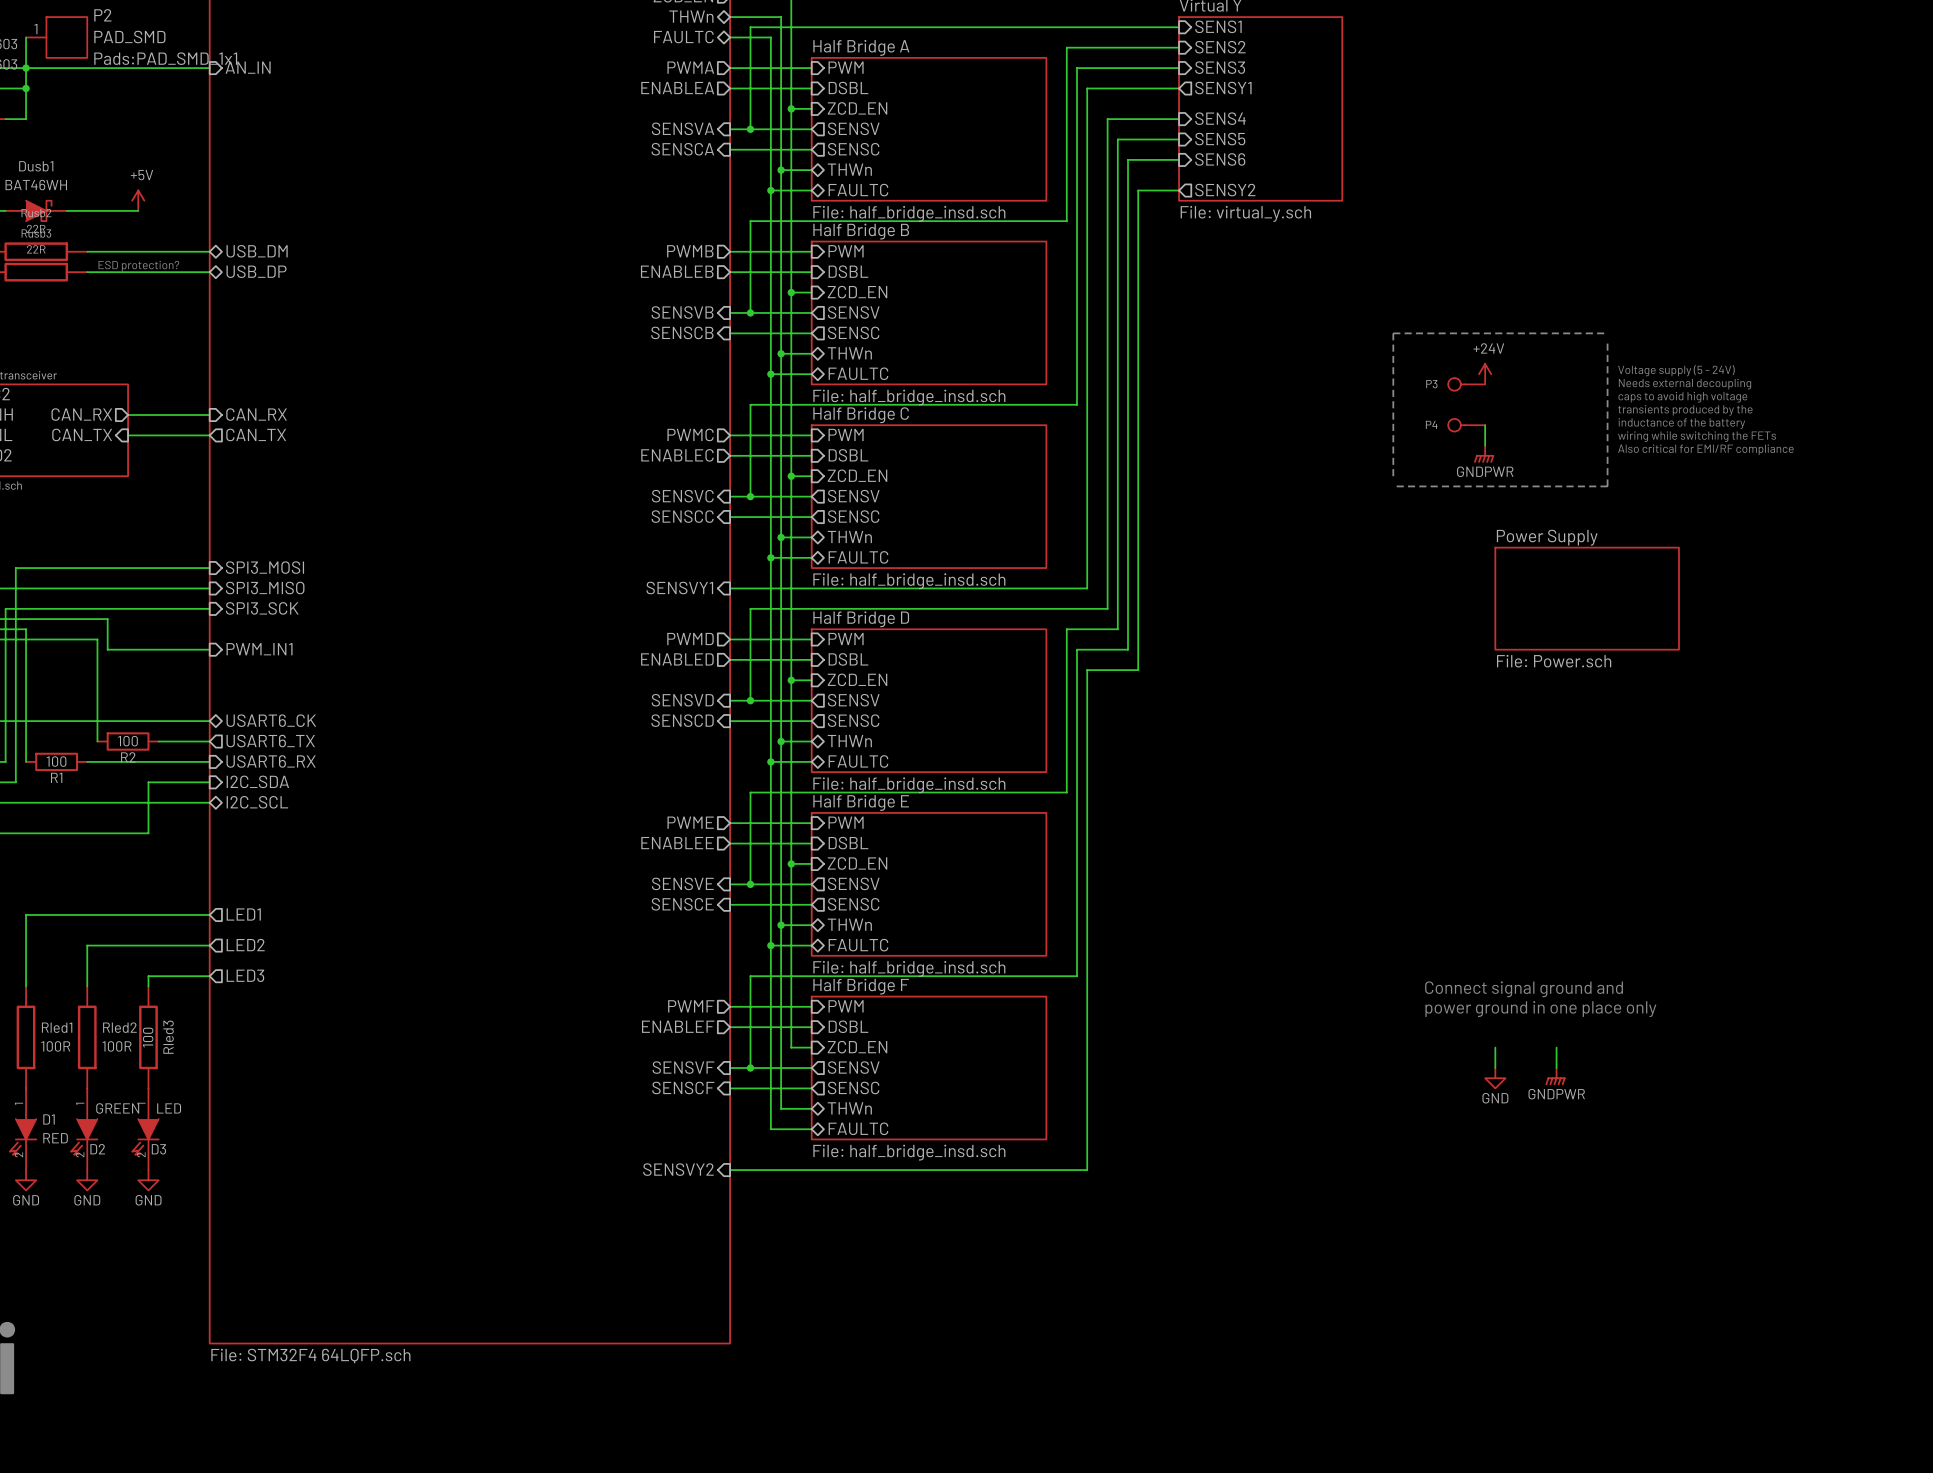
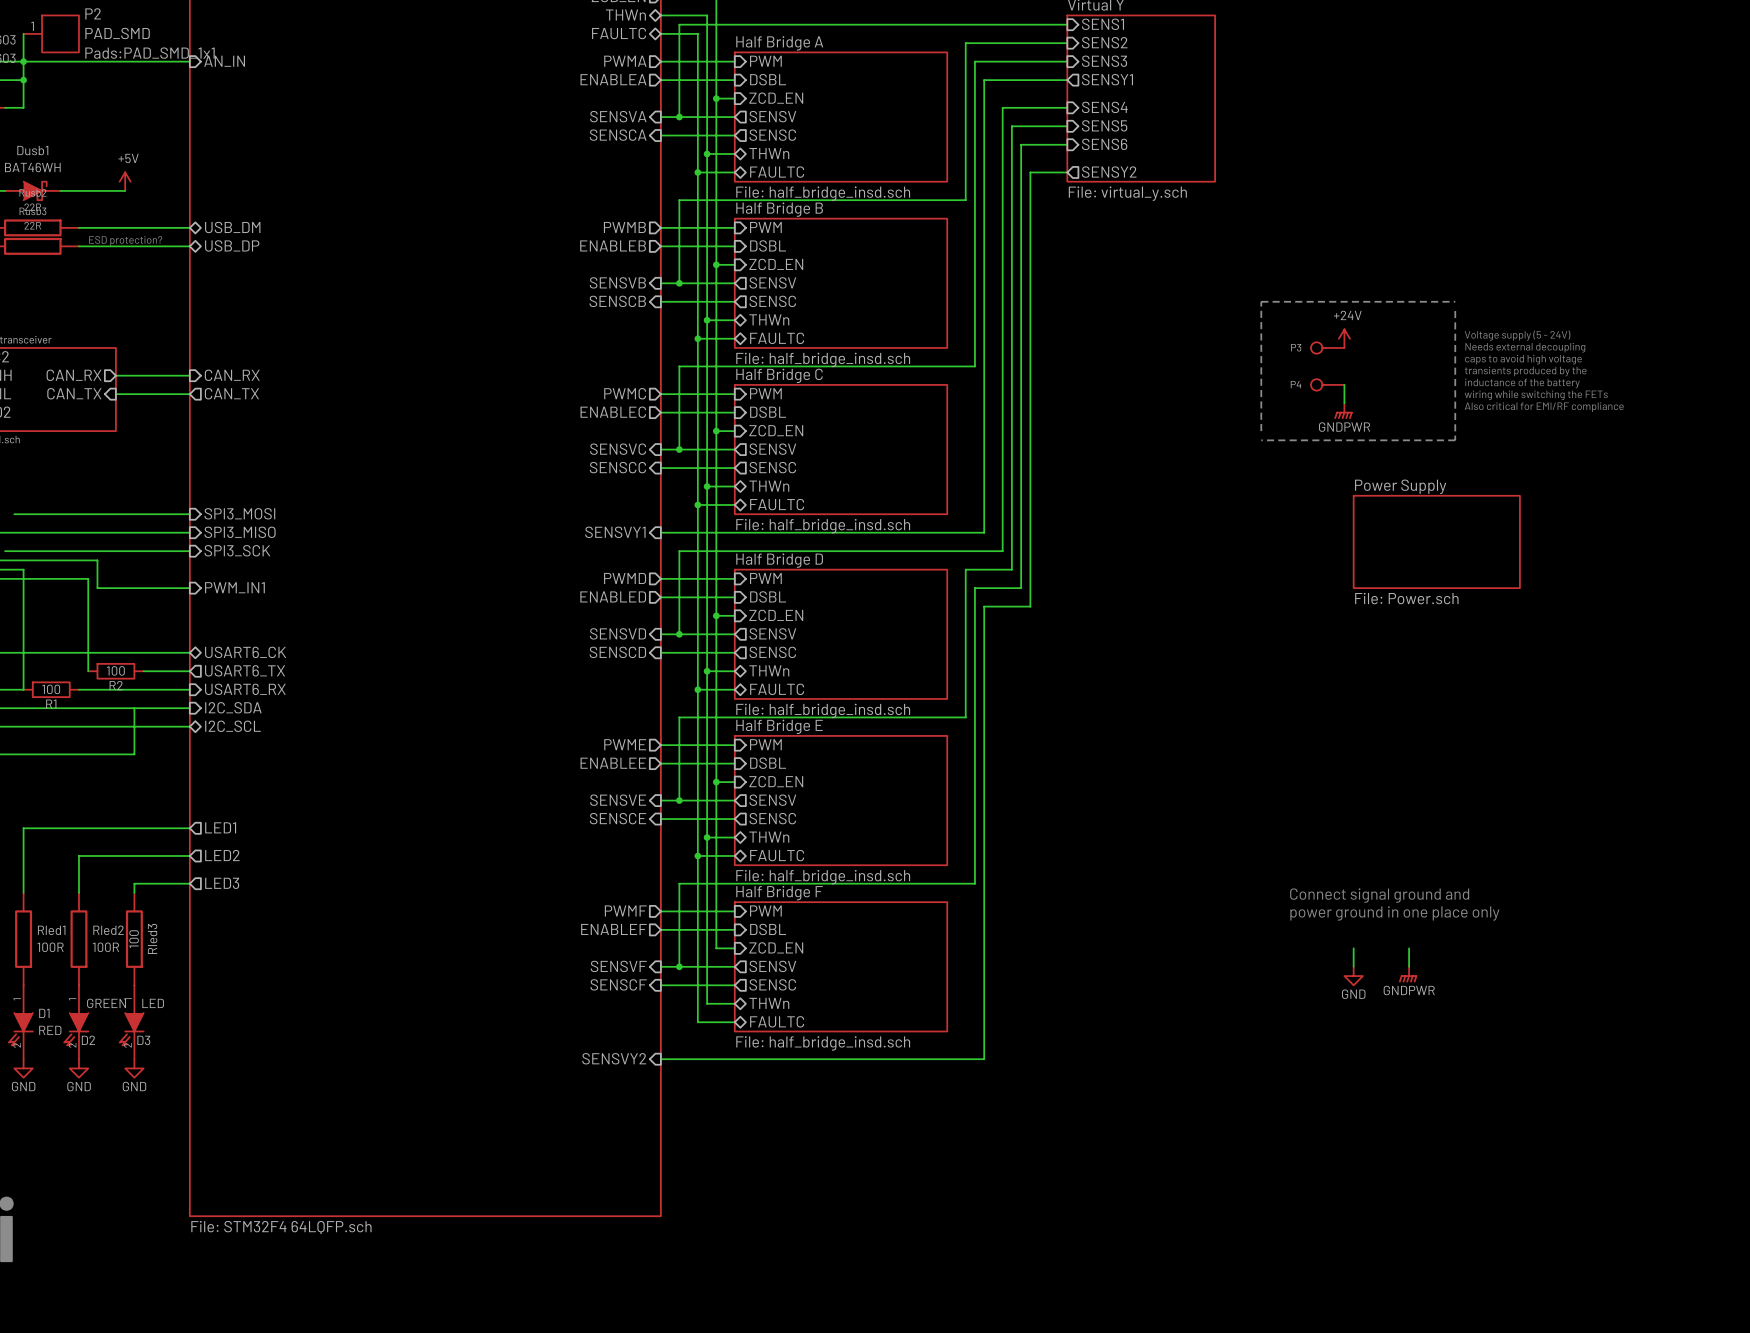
wire: (15, 568) (15, 782) -> (134, 708) (14, 708)
wire: (5, 608) (5, 761) -> (23, 689) (5, 689)

